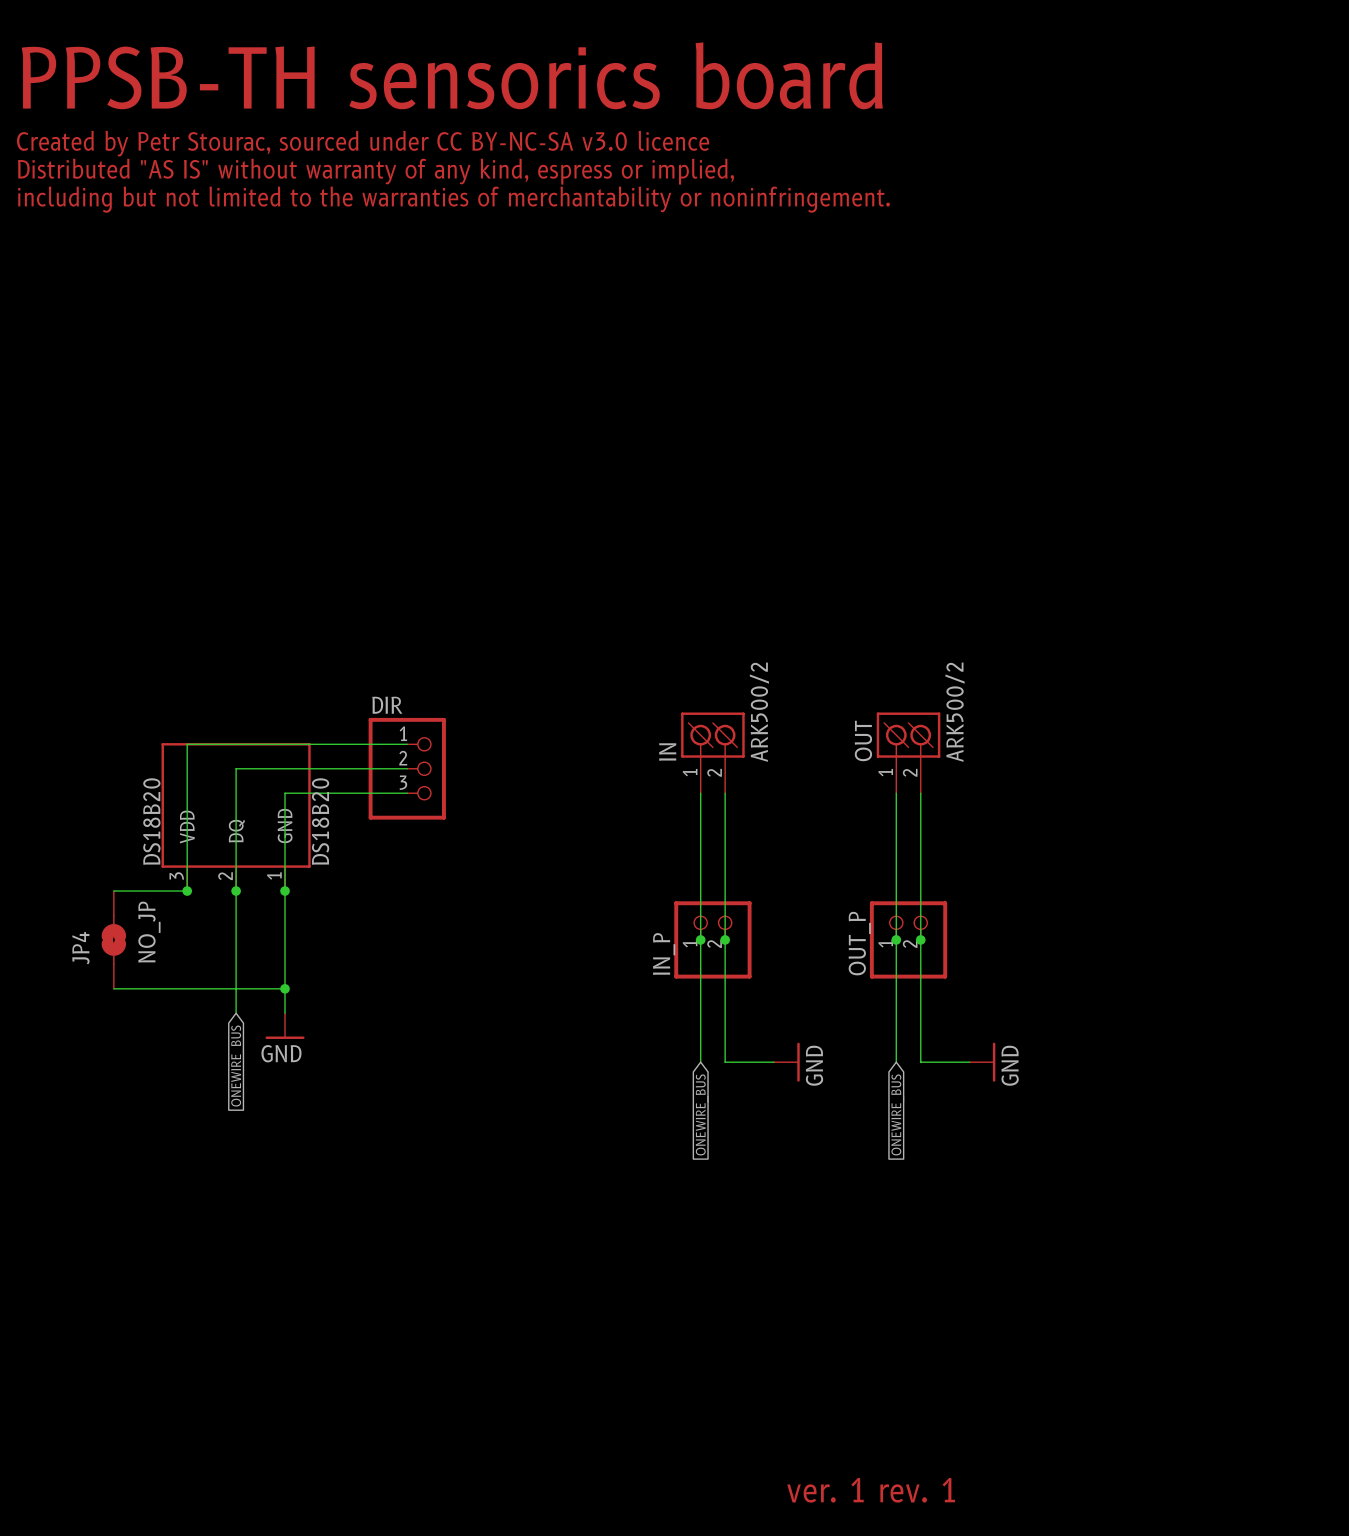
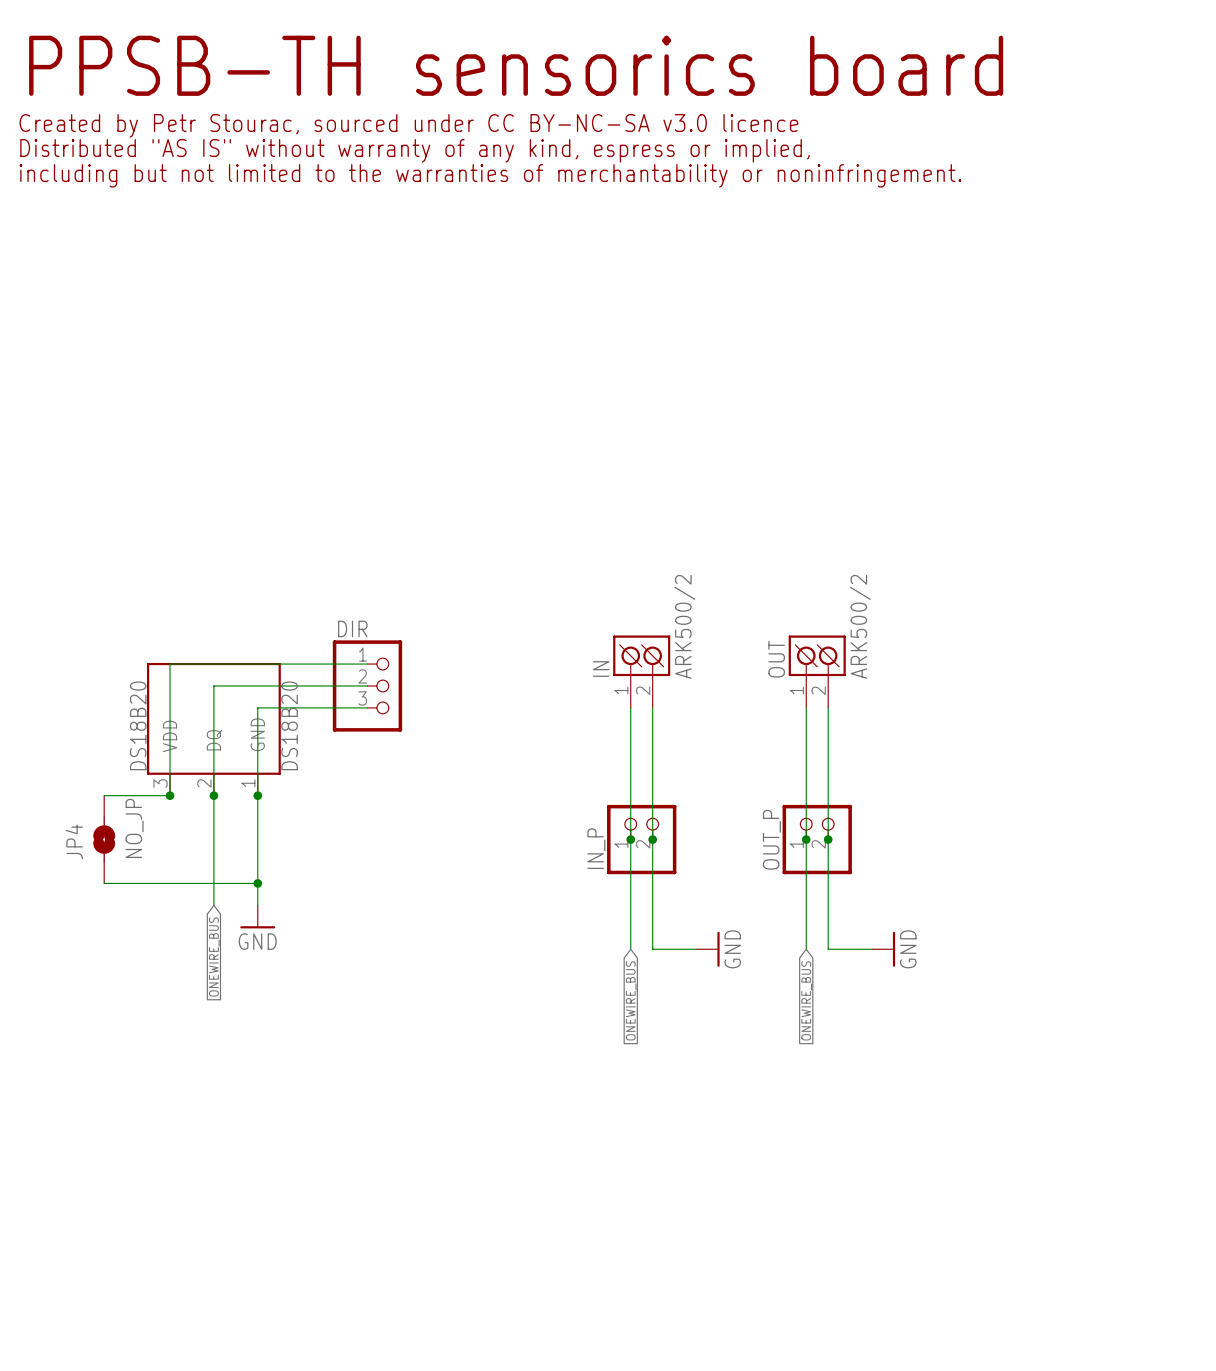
text: ver. 1 rev. 1 (871, 1490) -> none

